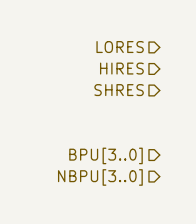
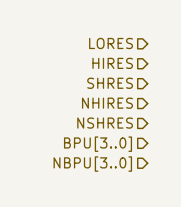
hierarchical label: none -> NHIRES (107, 103)
hierarchical label: none -> NSHRES (105, 123)

